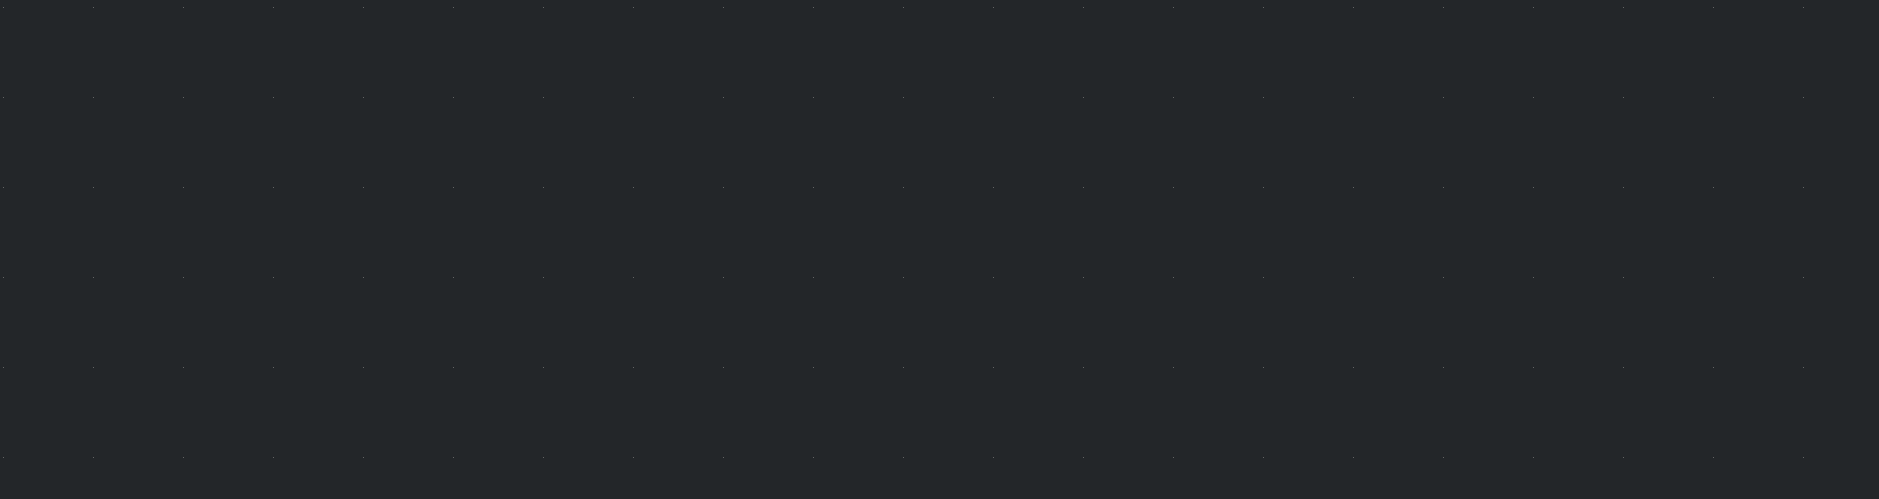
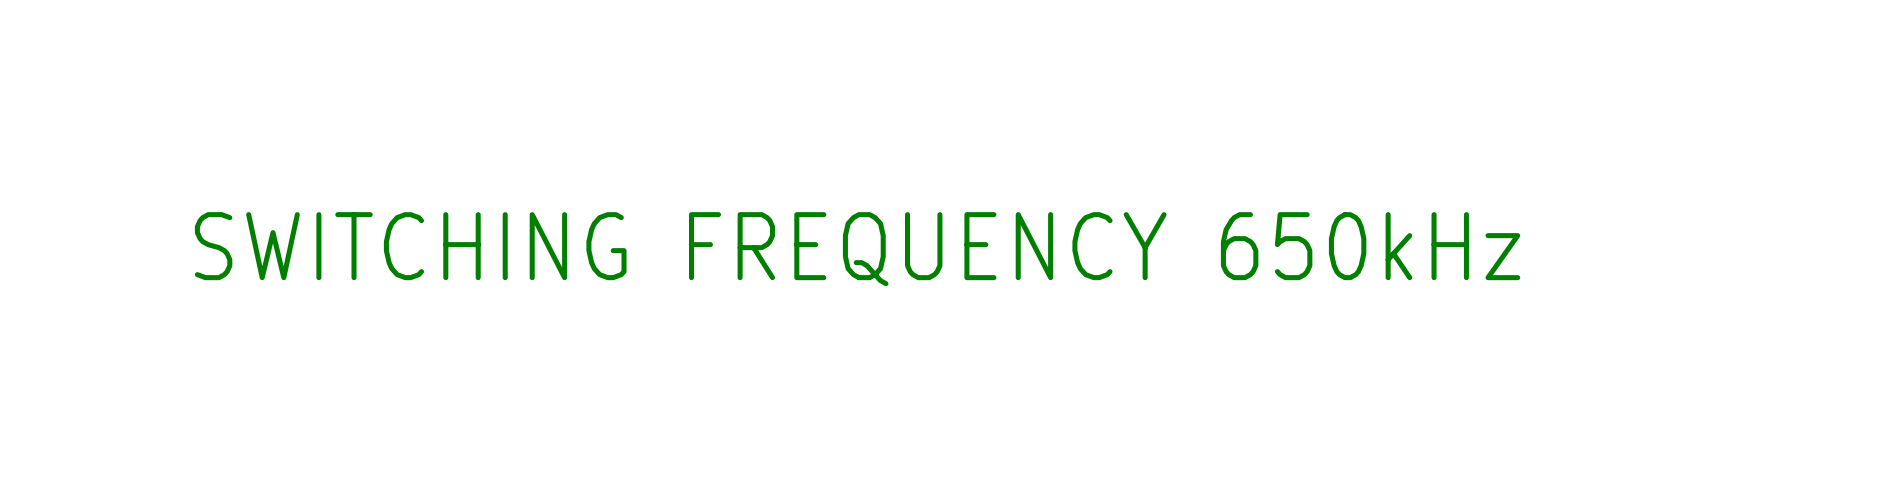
text: none -> SWITCHING FREQUENCY 650kHz (857, 249)

